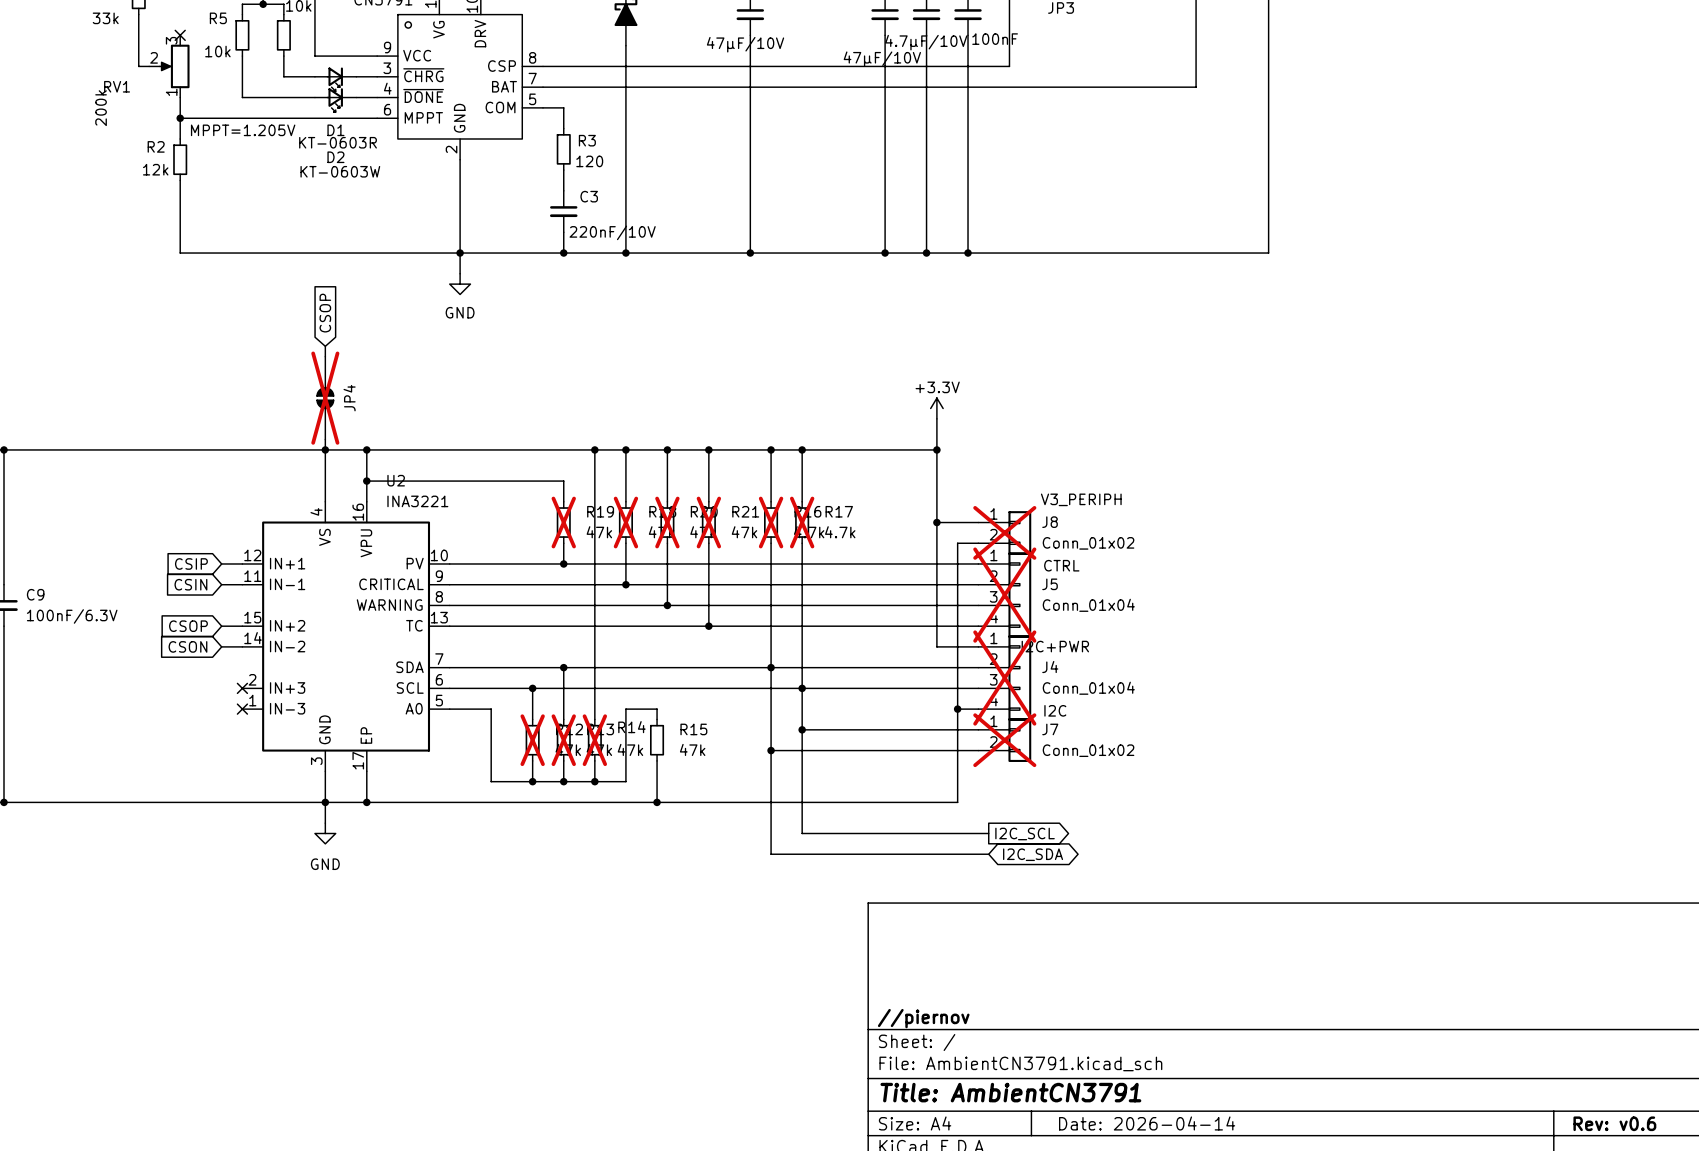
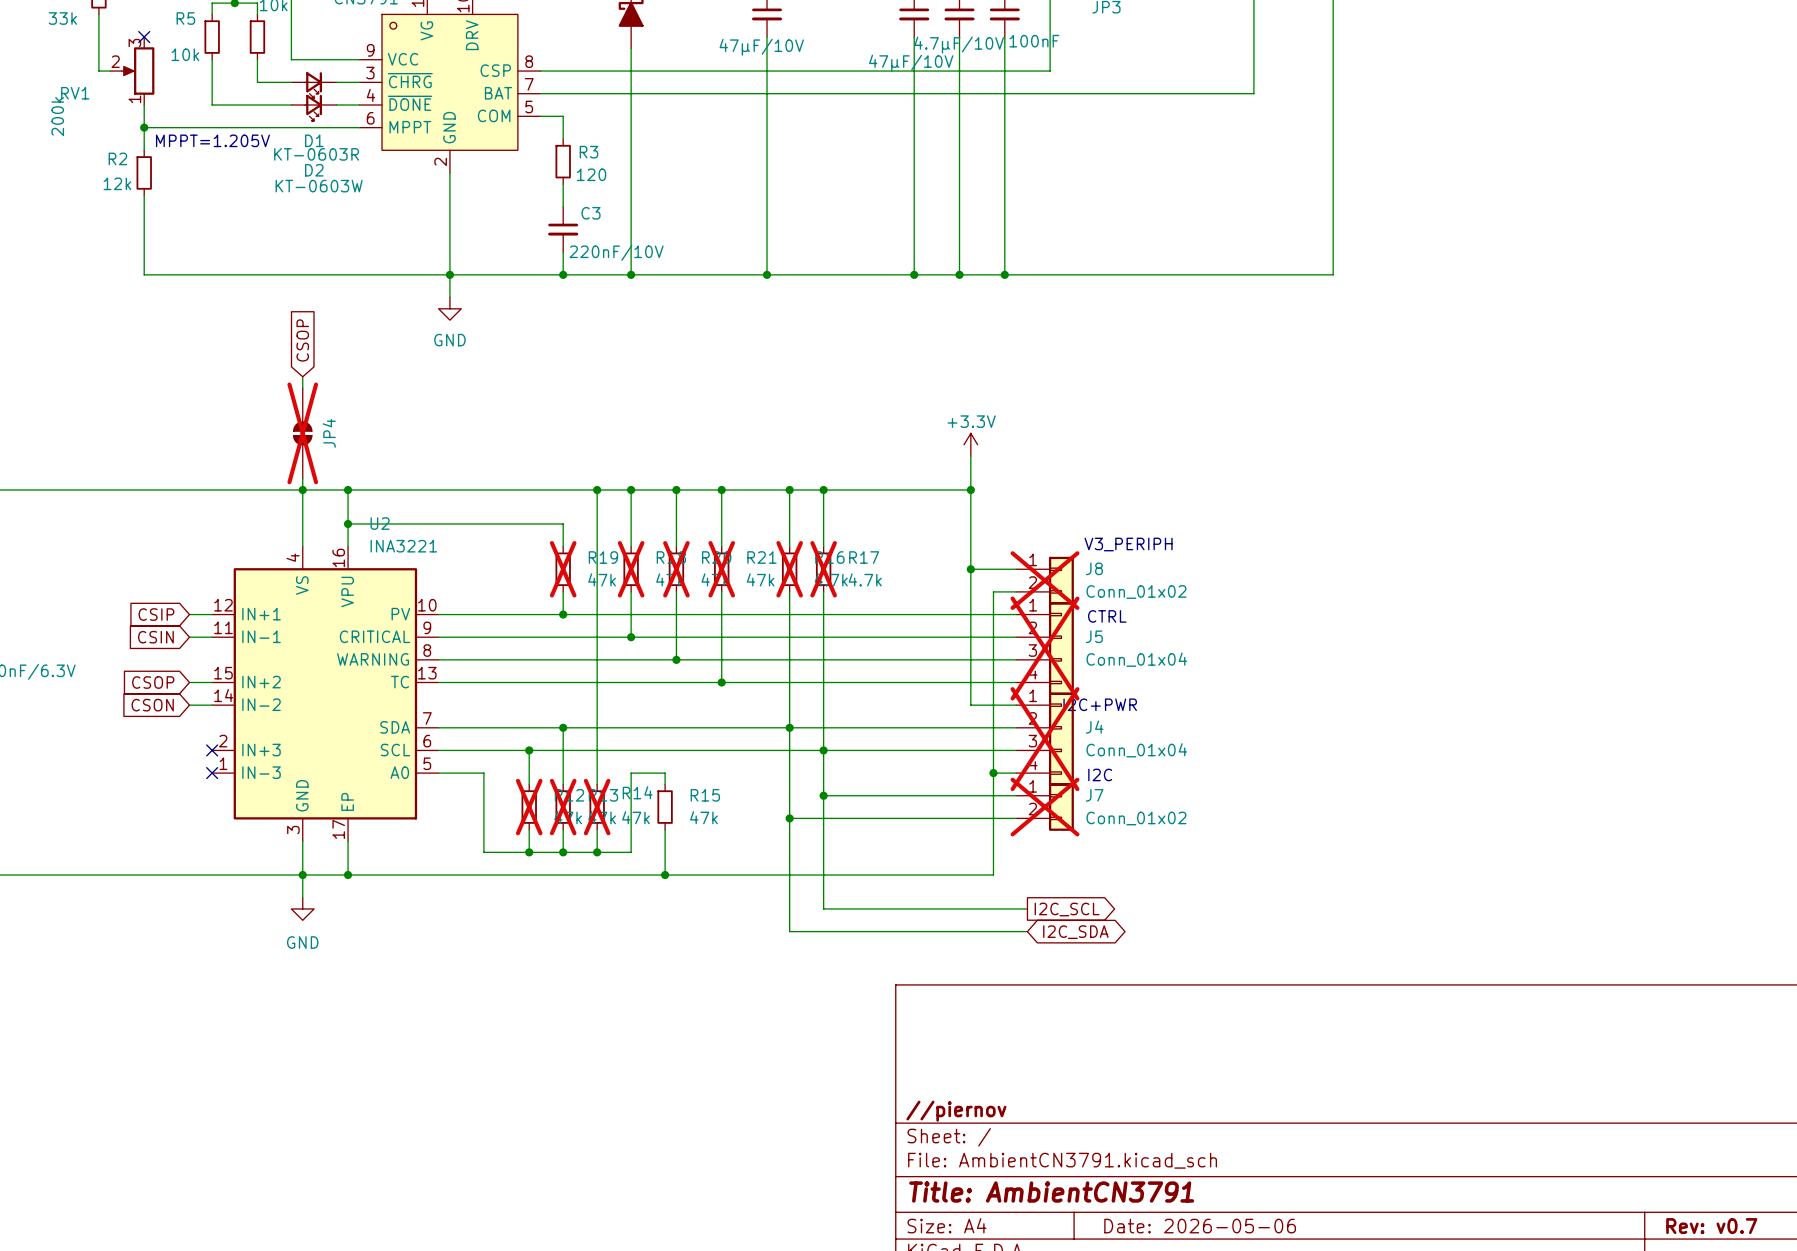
title block: Date: 2026-04-14 (1147, 1123) -> Date: 2026-05-06 (1200, 1226)
title block: Rev: v0.6 (1614, 1123) -> Rev: v0.7 (1711, 1226)

